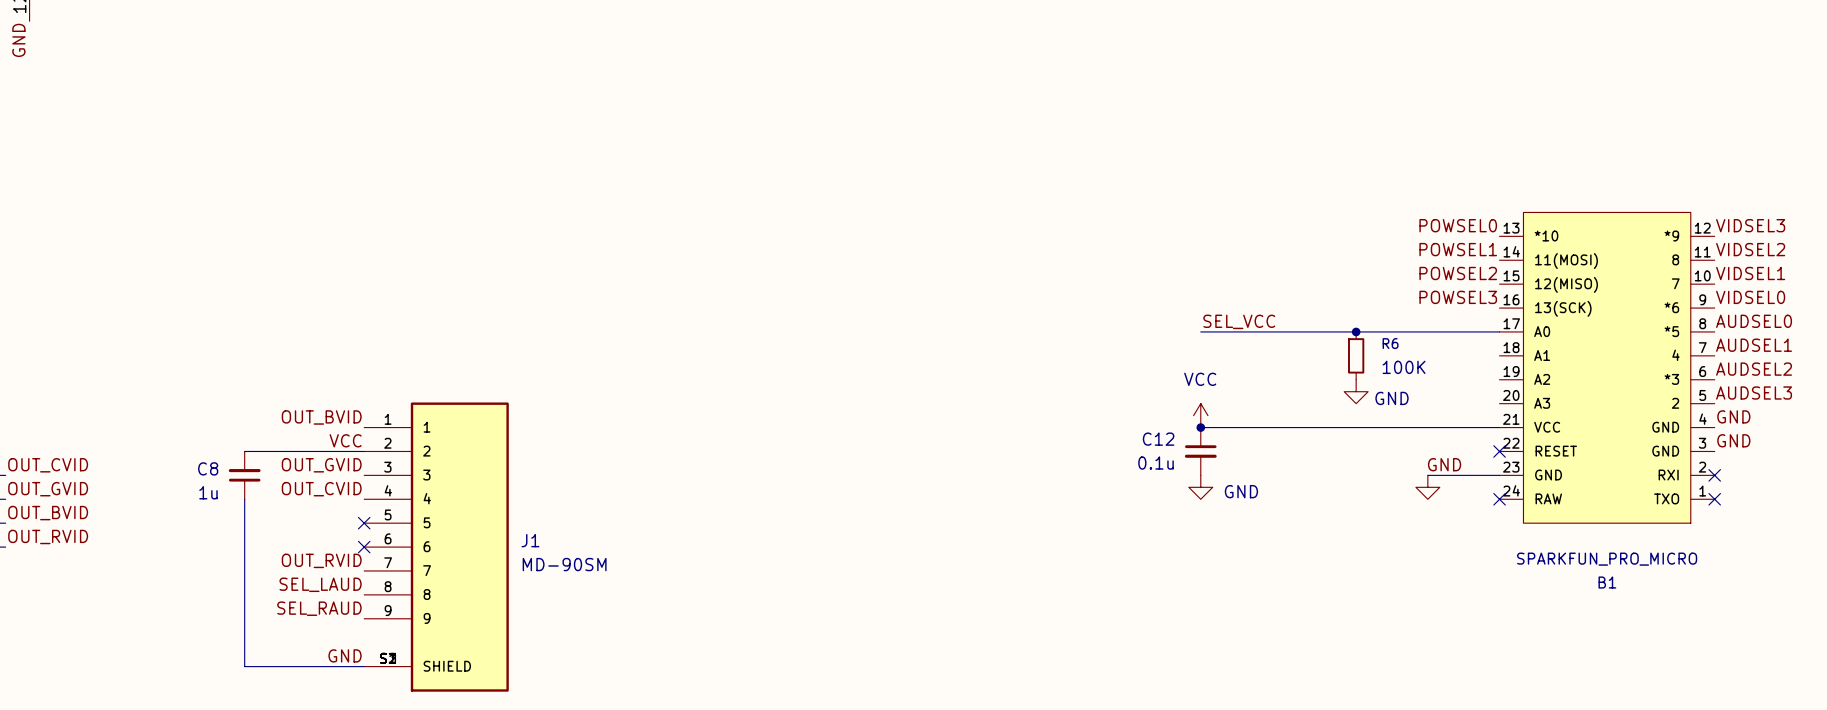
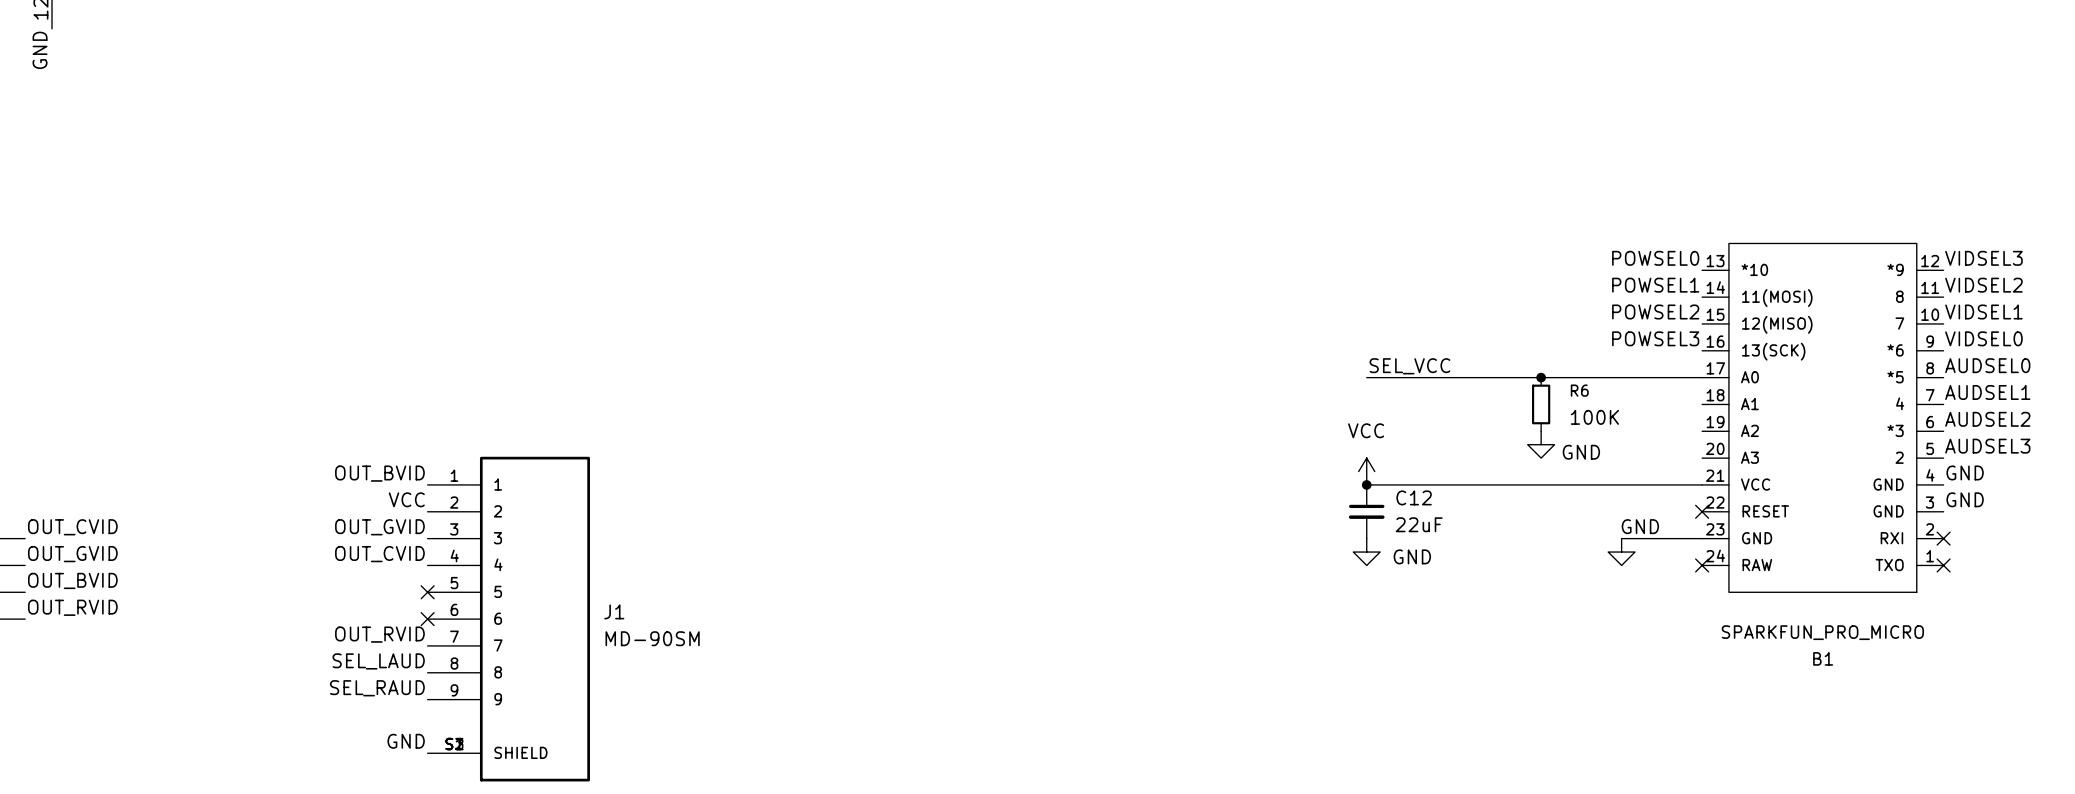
C12 name position: C12 (1158, 439) -> C12 (1414, 497)
wire: (244, 451) (364, 451) -> none
C12 value: 0.1u (1156, 463) -> 22uF (1419, 524)
C8: 1u (244, 475) -> none
wire: (244, 499) (244, 666) (364, 666) -> none

